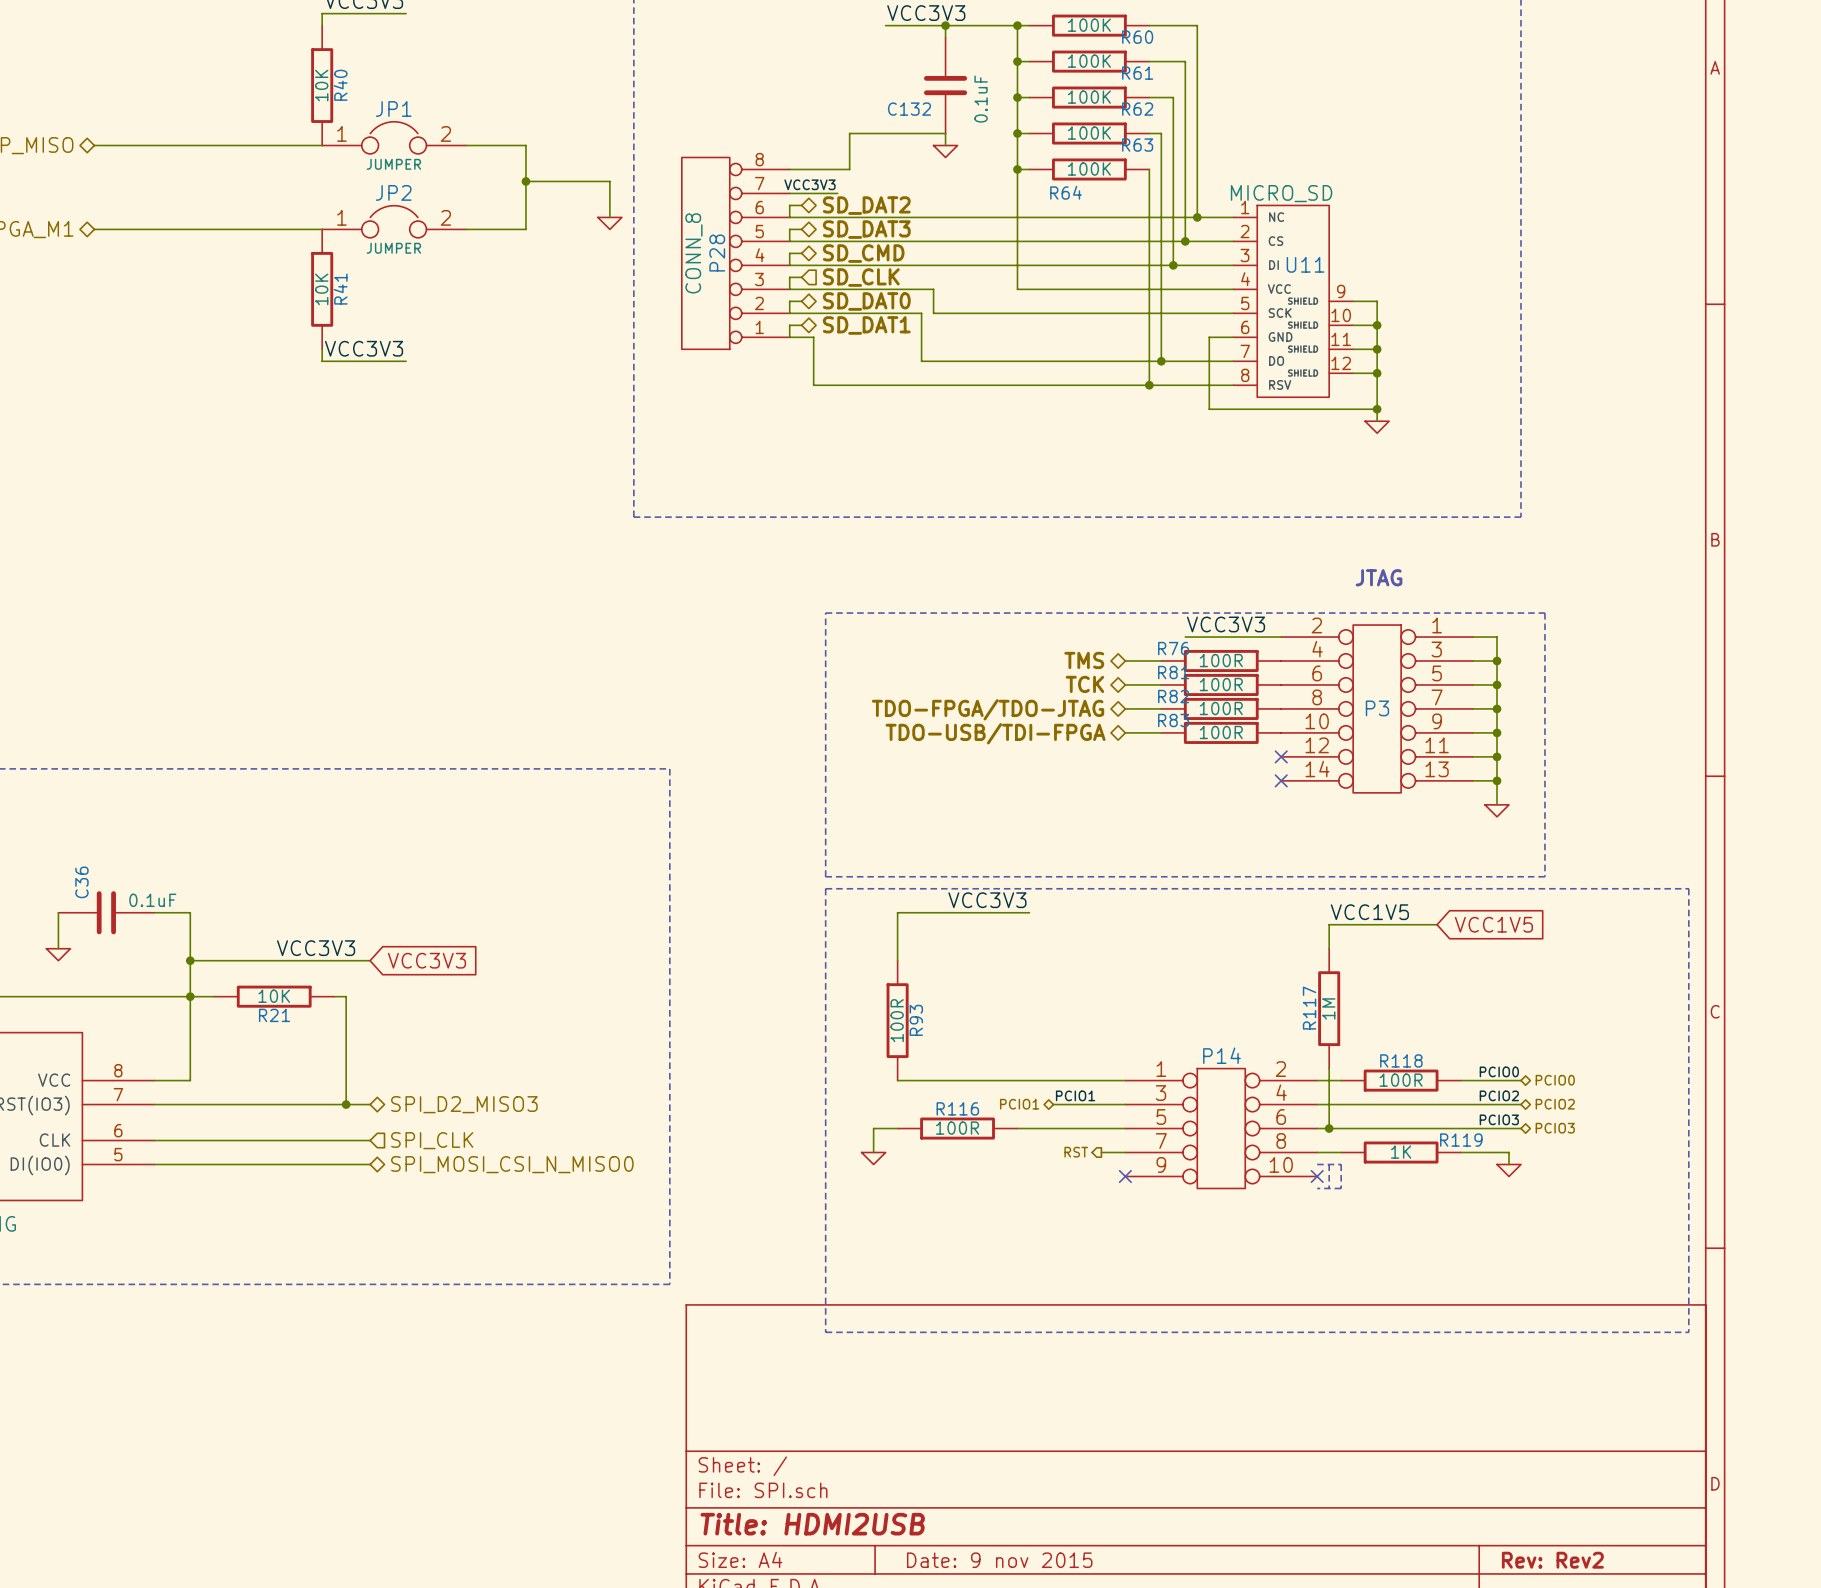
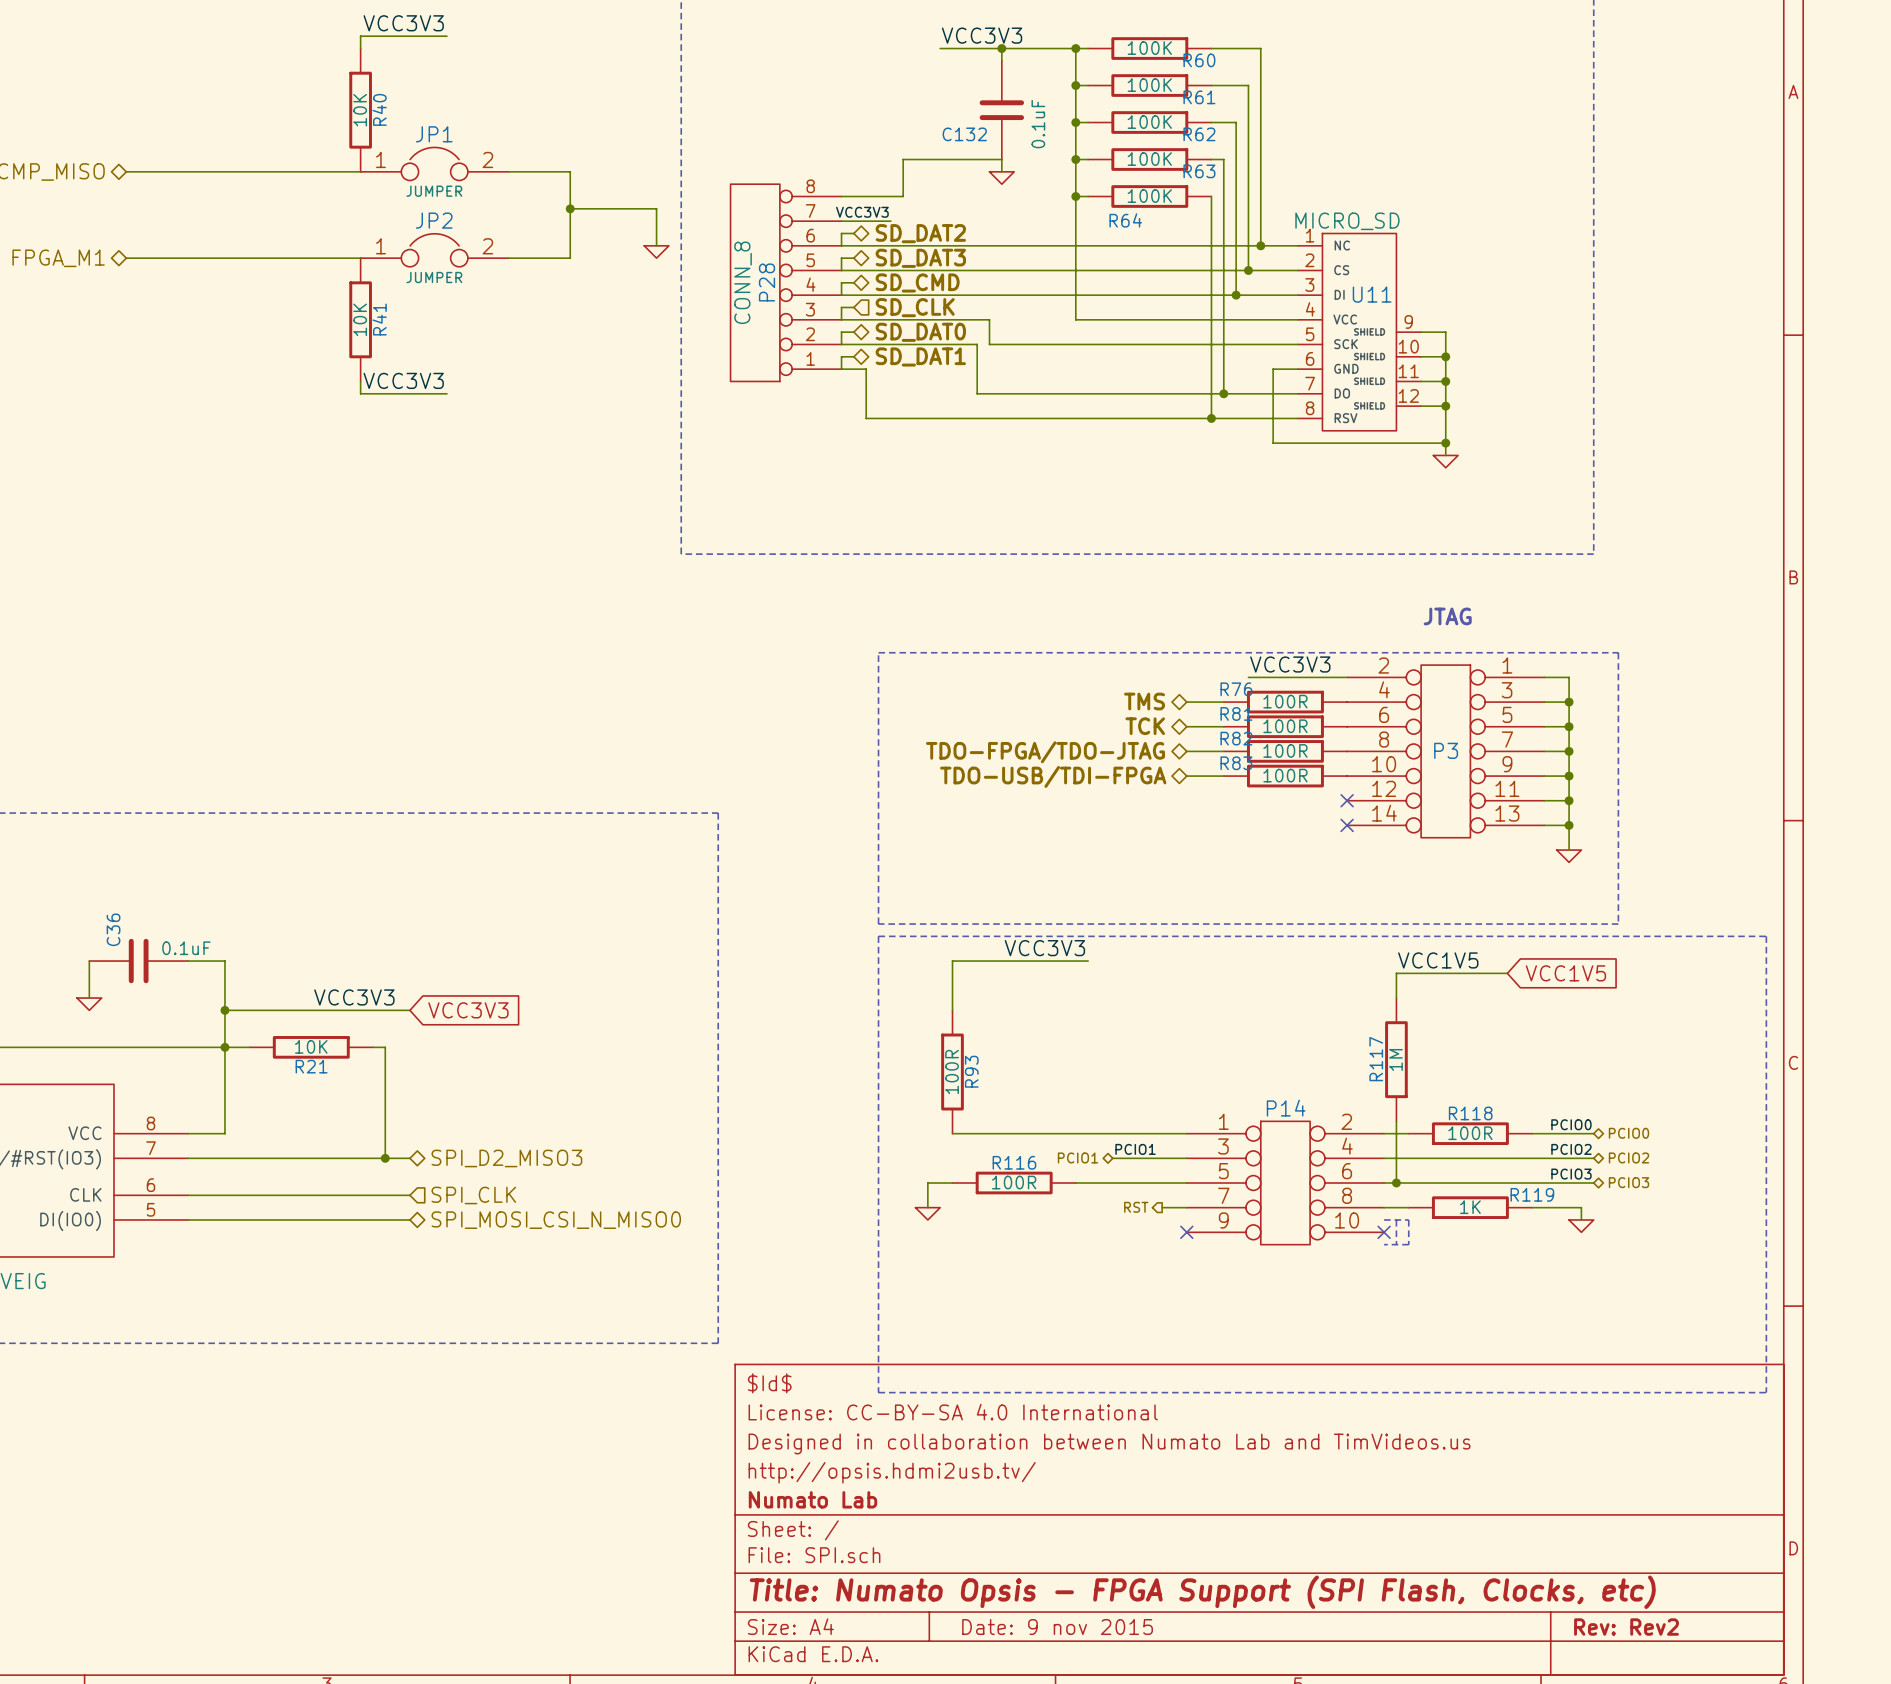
title block: none -> $Id$ (769, 1383)
title block: none -> License: CC-BY-SA 4.0 International (953, 1412)
title block: none -> Designed in collaboration between Numato Lab and TimVideos.us (1109, 1444)
title block: none -> http://opsis.hdmi2usb.tv/ (892, 1472)
title block: none -> Numato Lab (812, 1499)
title block: Title: HDMI2USB (812, 1524) -> Title: Numato Opsis - FPGA Support (SPI Flash, Clocks, etc) (1202, 1592)

